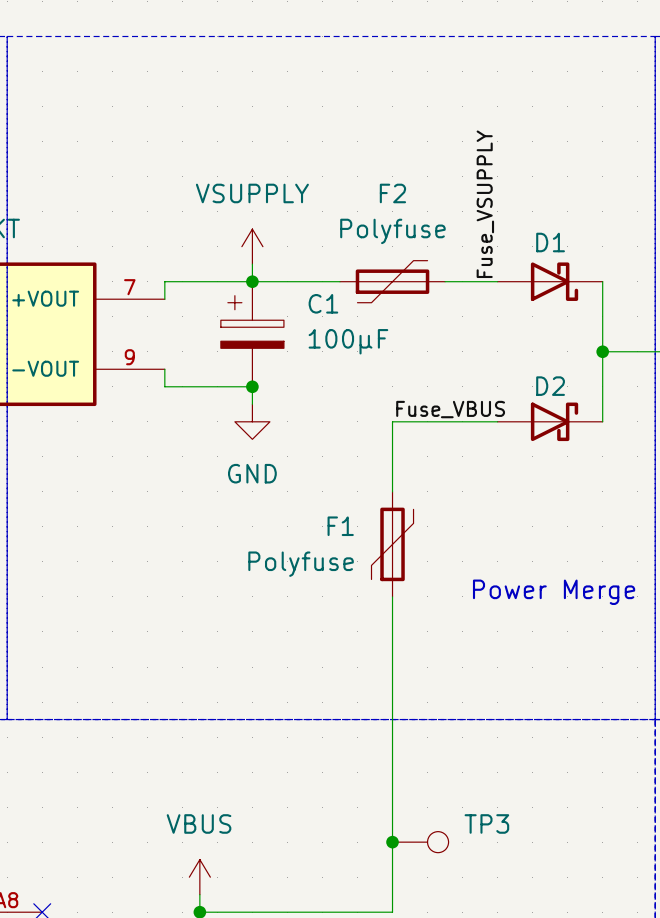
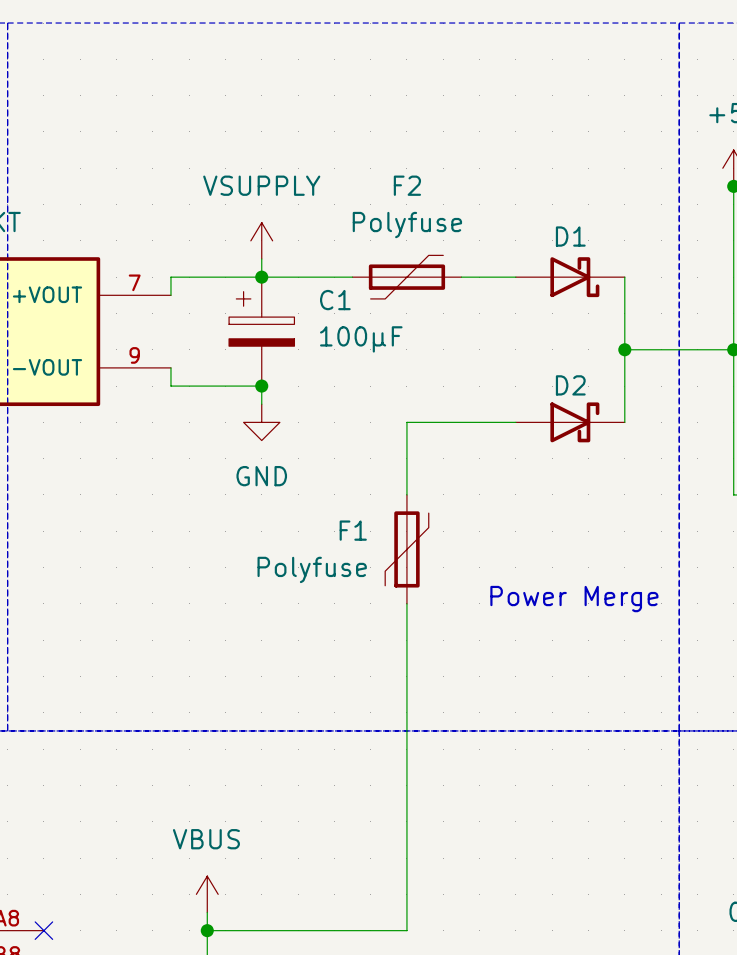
label: Fuse_VSUPPLY (485, 204) -> none
label: Fuse_VBUS (450, 409) -> none
junction: (392, 842) -> none
TP3: (420, 842) -> none

